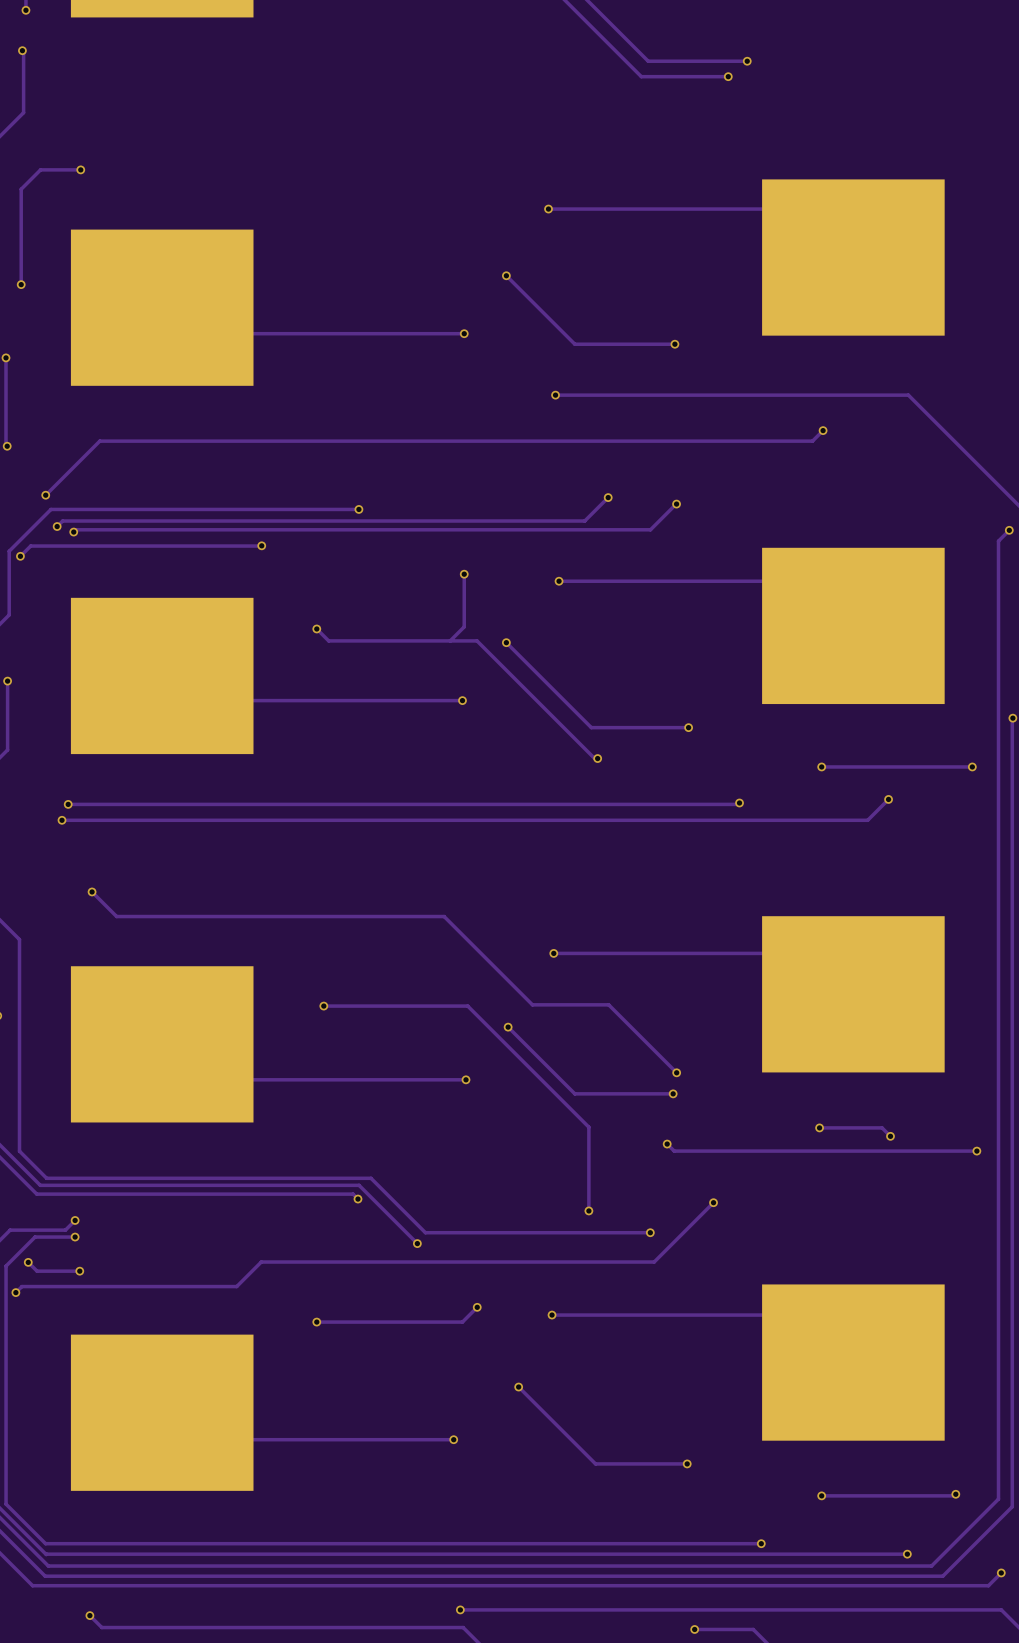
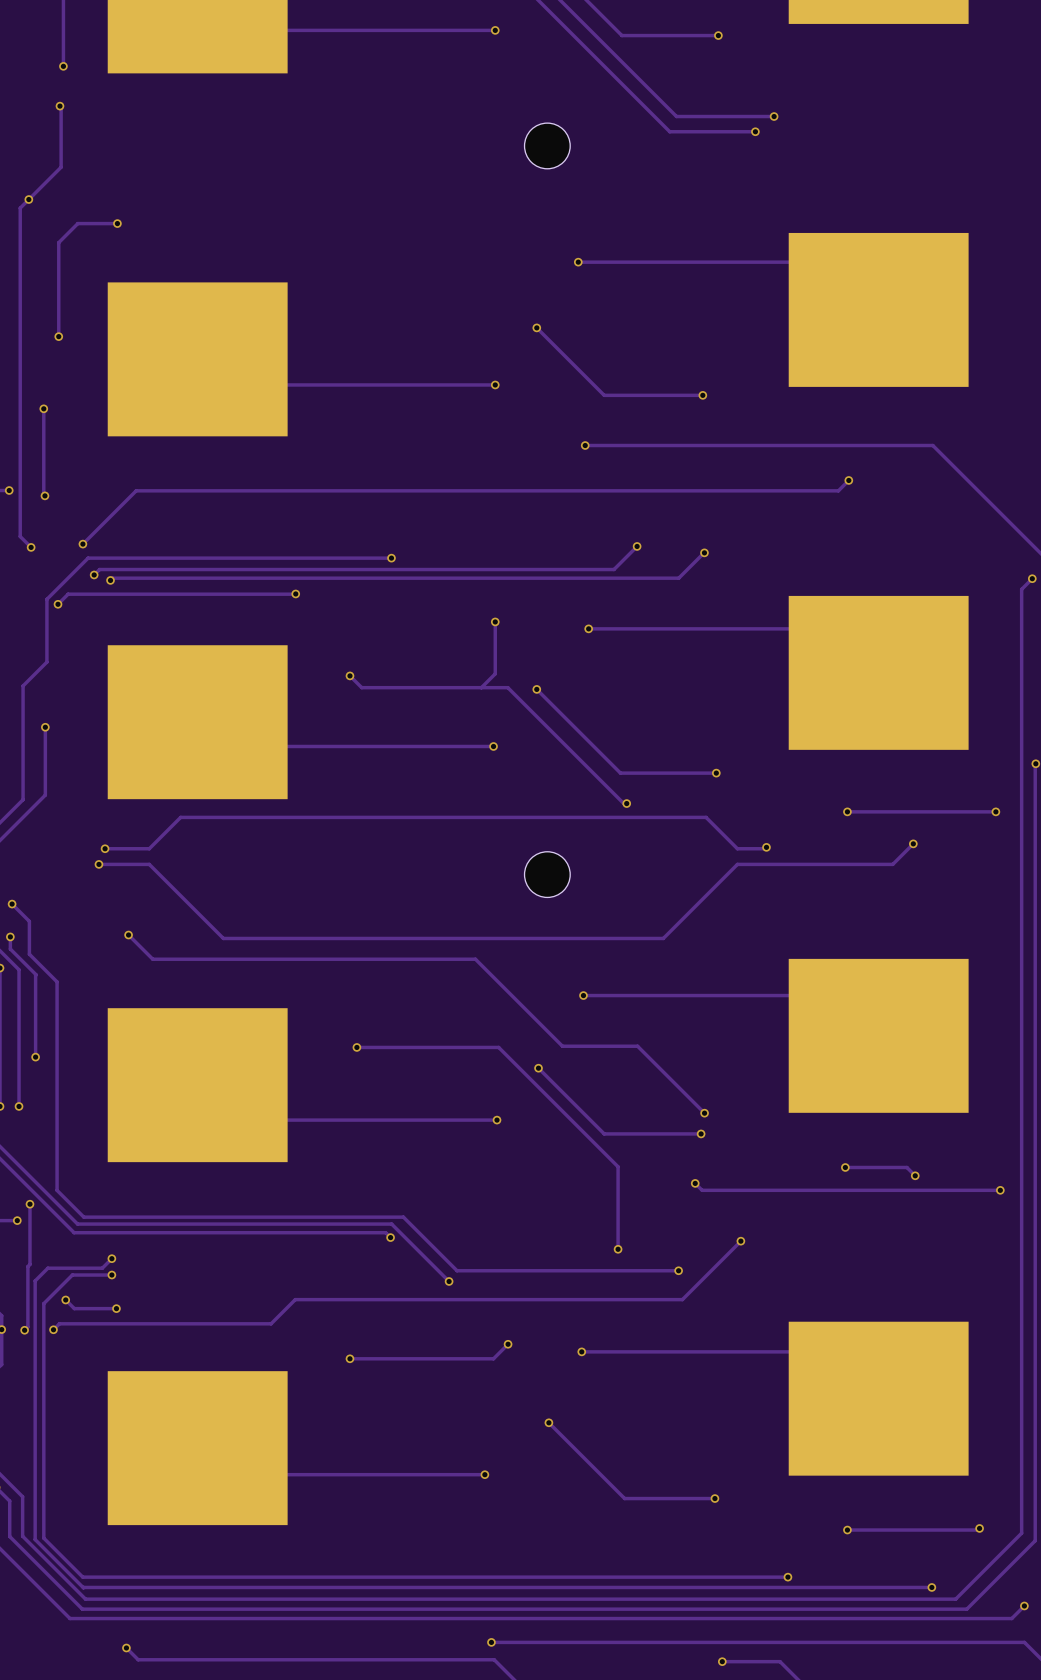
part: none -> (547, 145)
track: (710, 804) (113, 804) -> (737, 848) (706, 817) (180, 817) (149, 848)
track: (710, 820) (113, 820) -> (737, 864) (663, 938) (223, 938) (149, 864)
part: none -> (547, 874)

